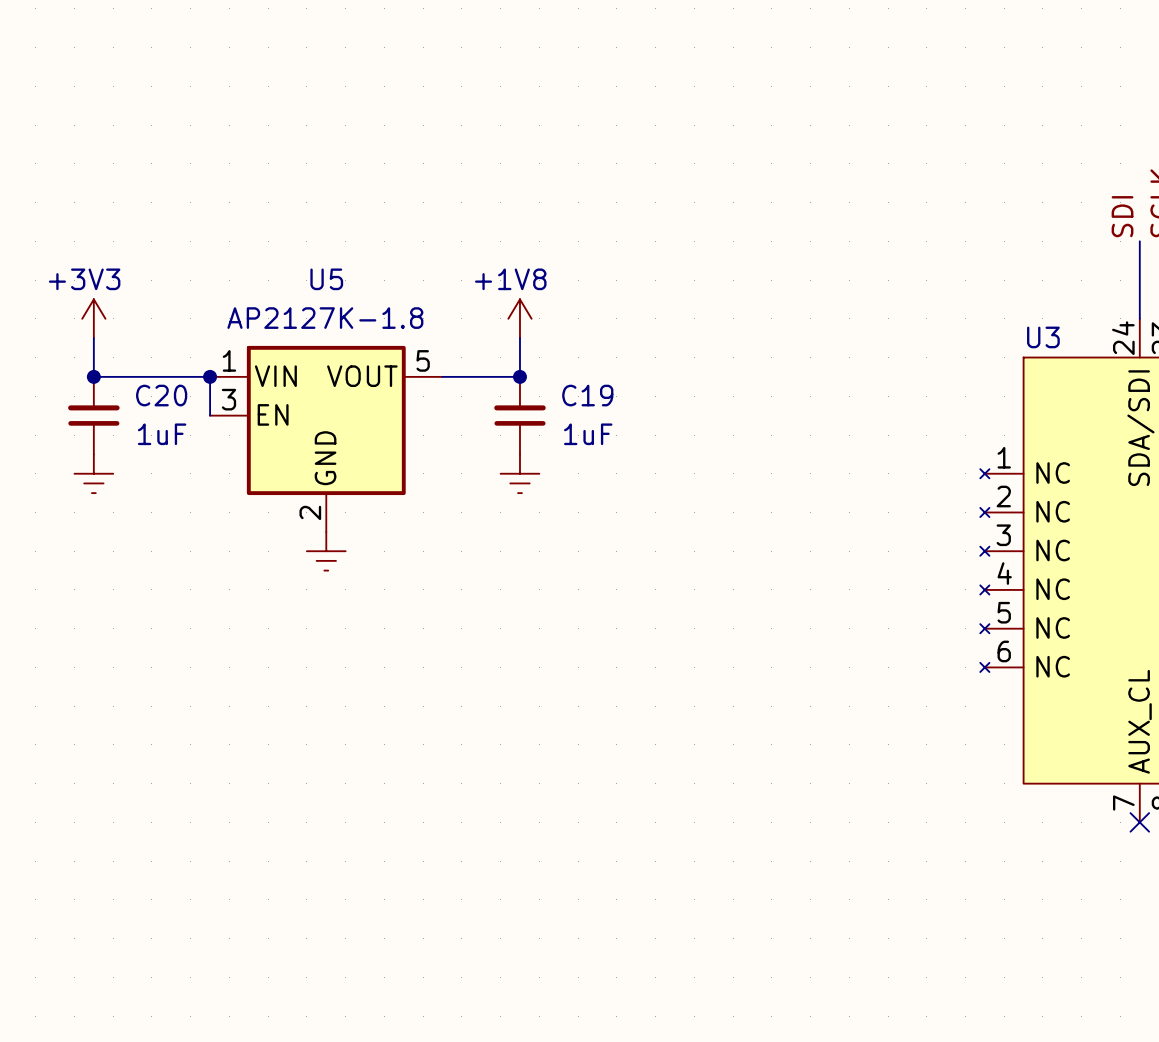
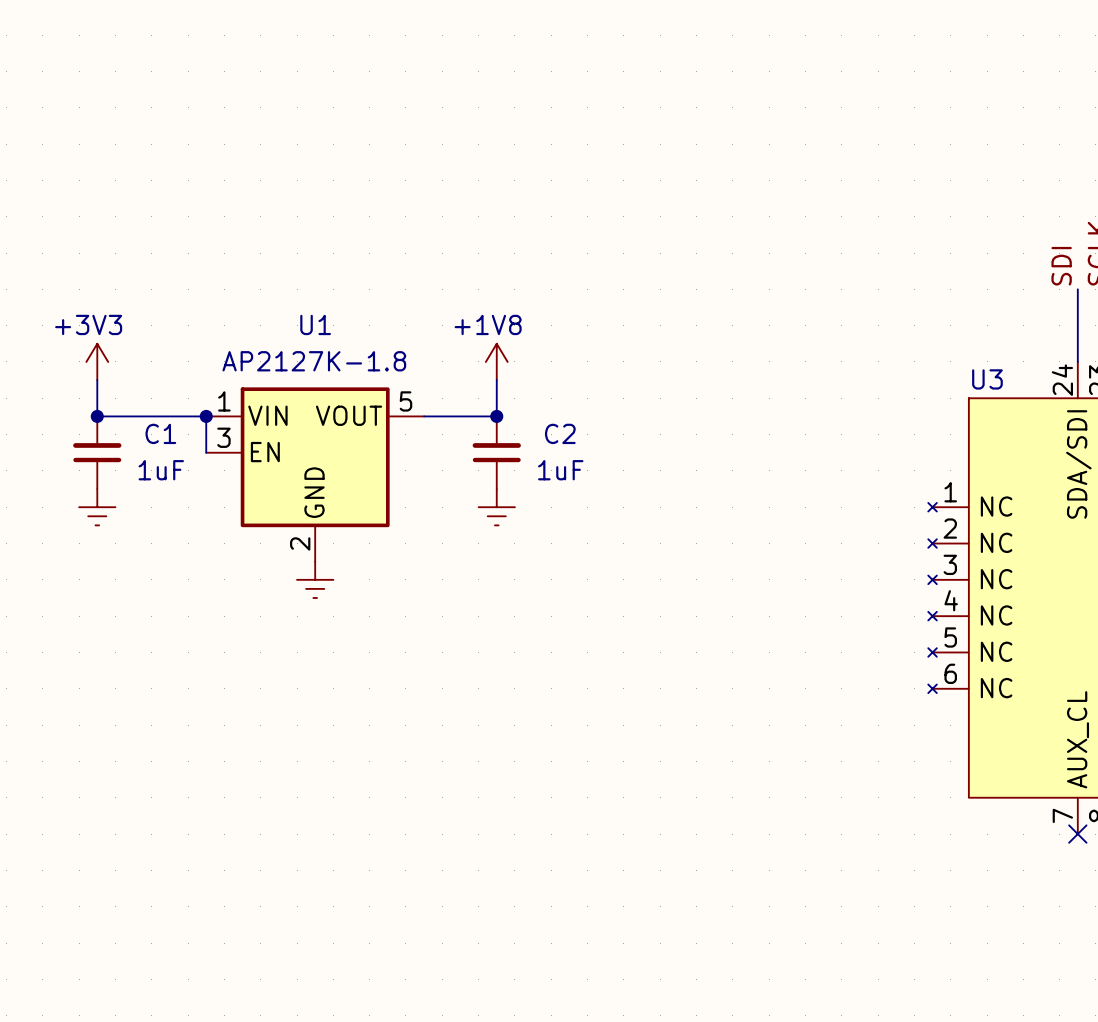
U5 name: U5 (326, 279) -> U1 (315, 324)
C20 name: C20 (161, 395) -> C1 (160, 433)
C19 name: C19 (587, 395) -> C2 (560, 433)

